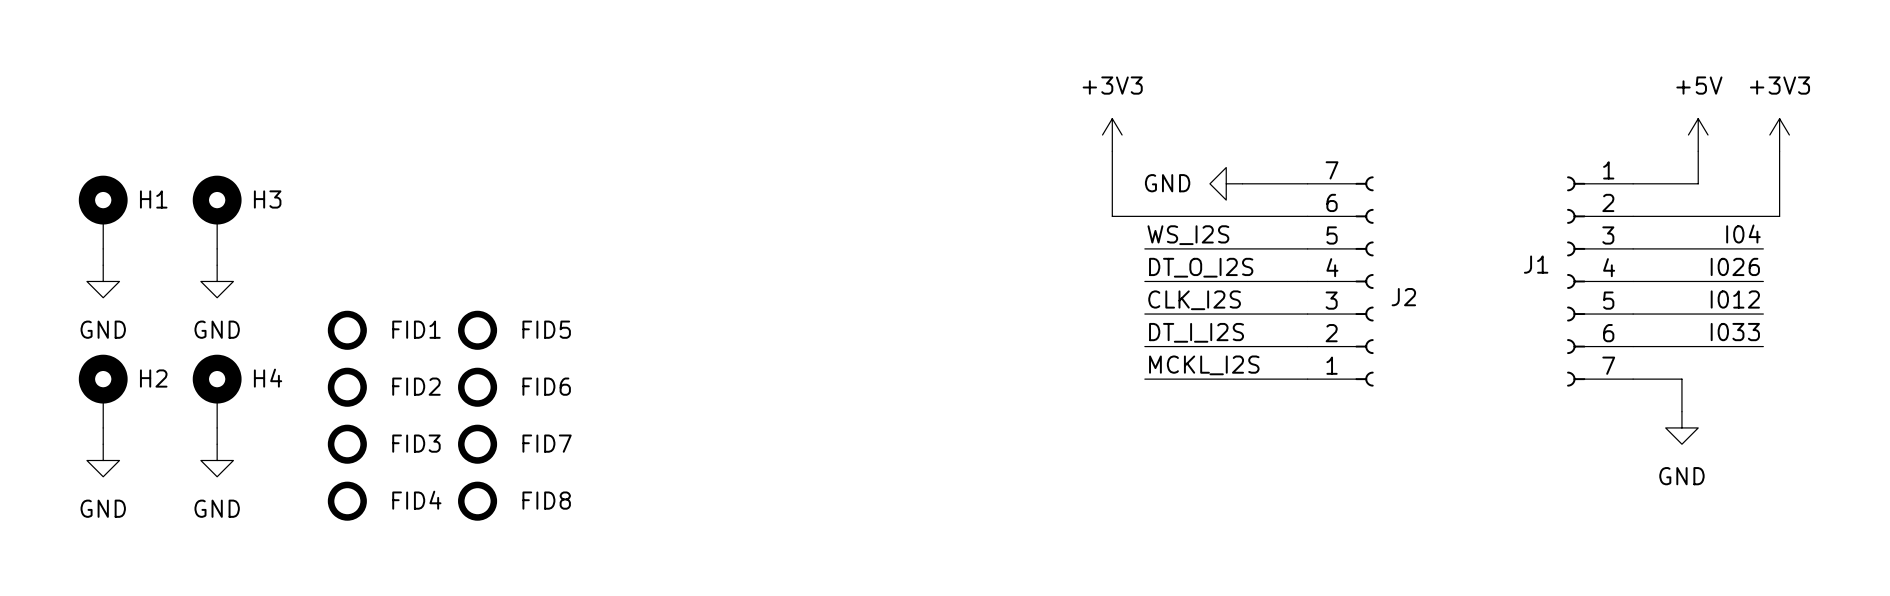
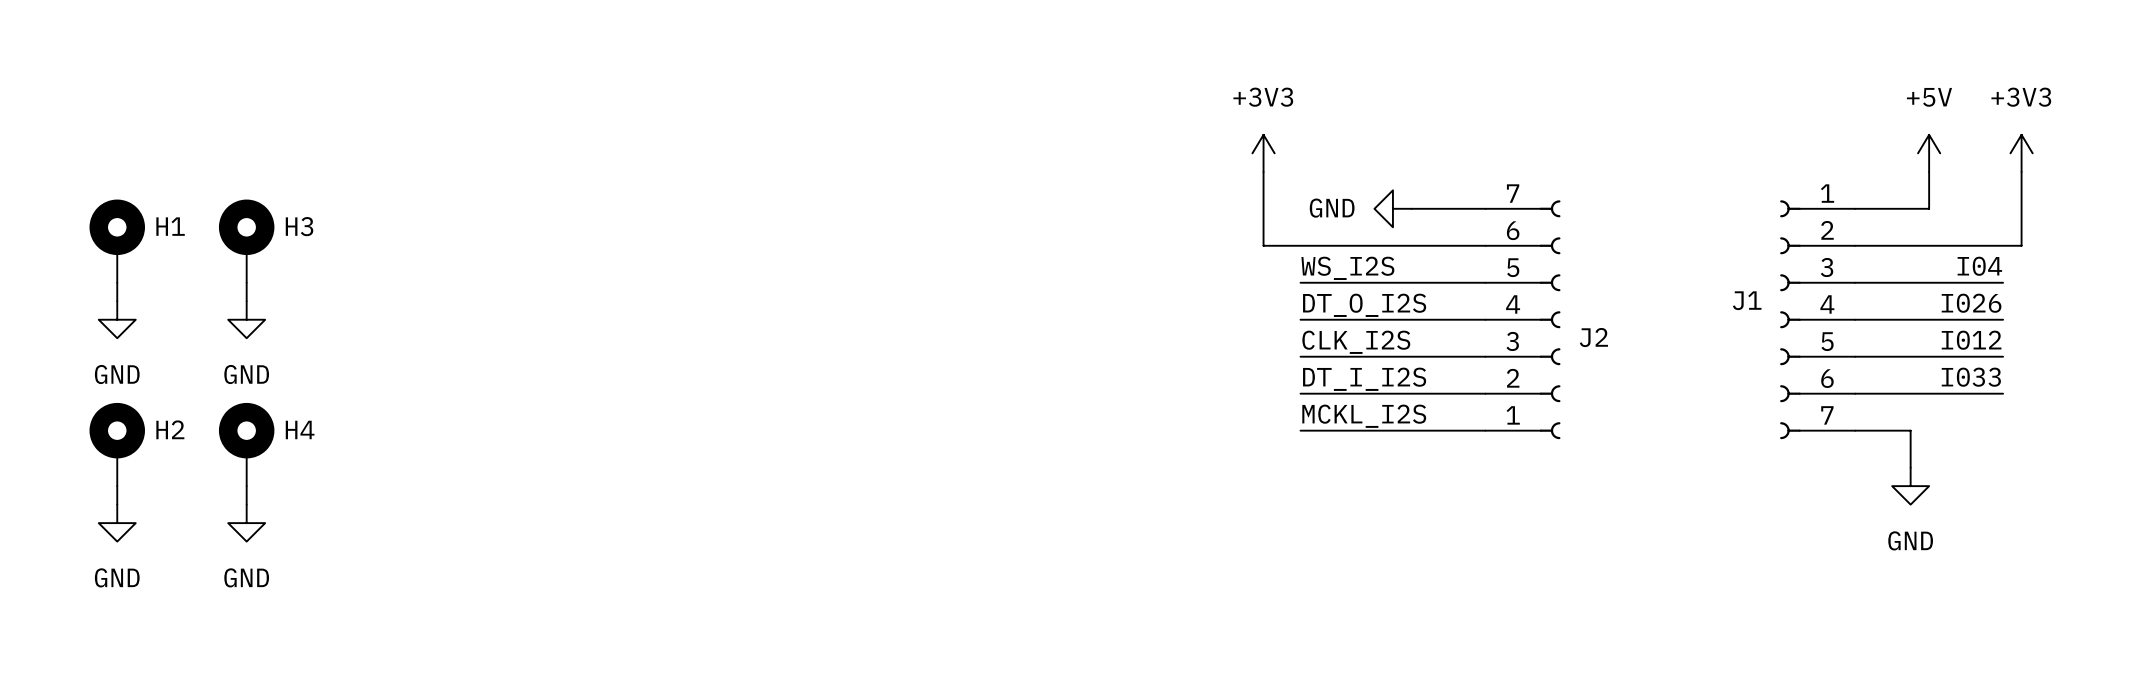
FID1: (347, 330) -> none
FID5: (477, 330) -> none
FID2: (347, 387) -> none
FID6: (477, 387) -> none
FID3: (347, 444) -> none
FID7: (477, 444) -> none
FID4: (347, 501) -> none
FID8: (477, 501) -> none

